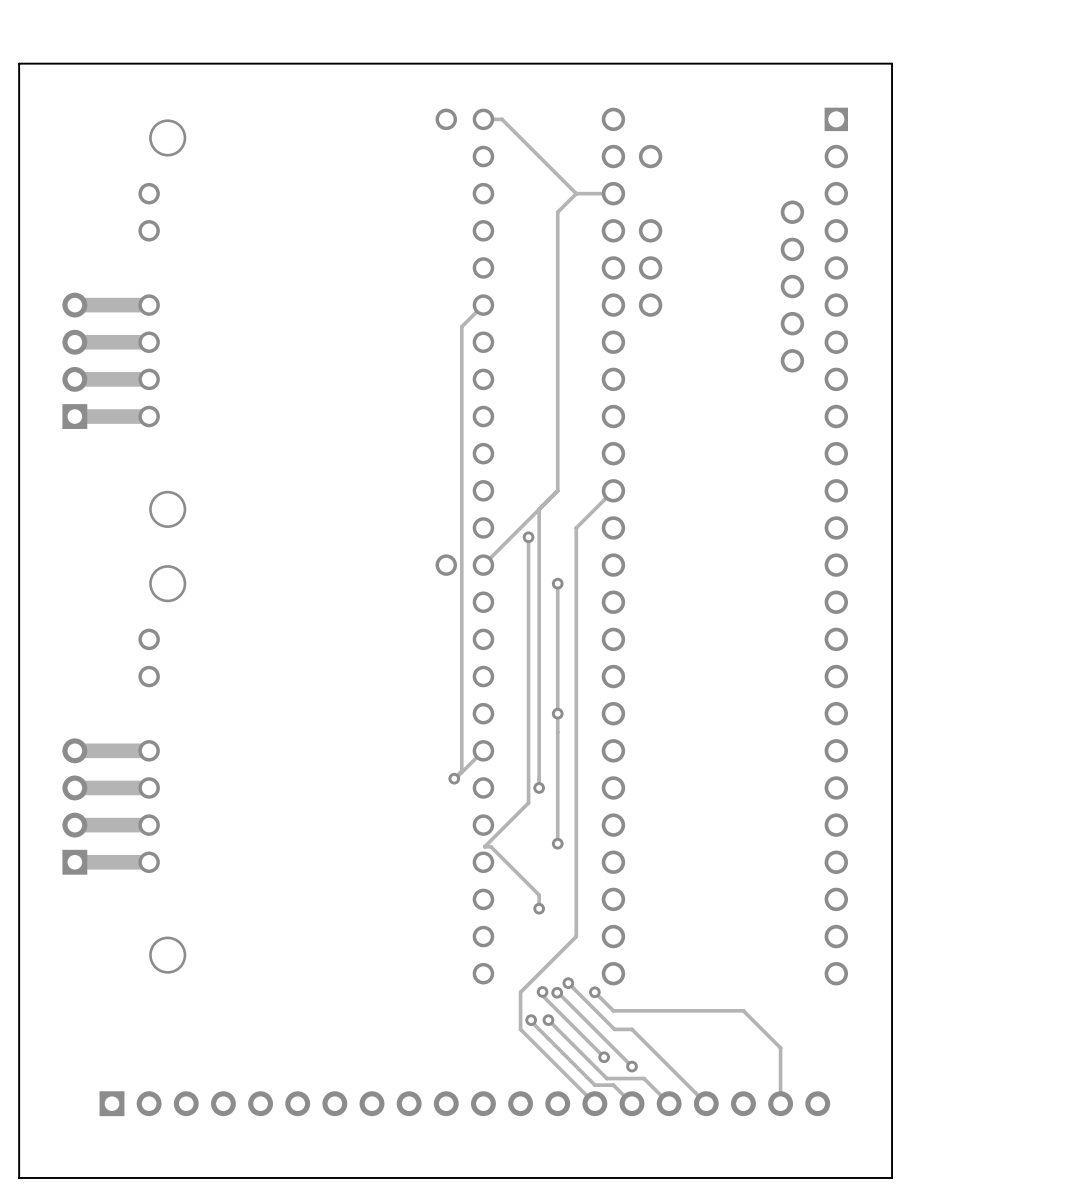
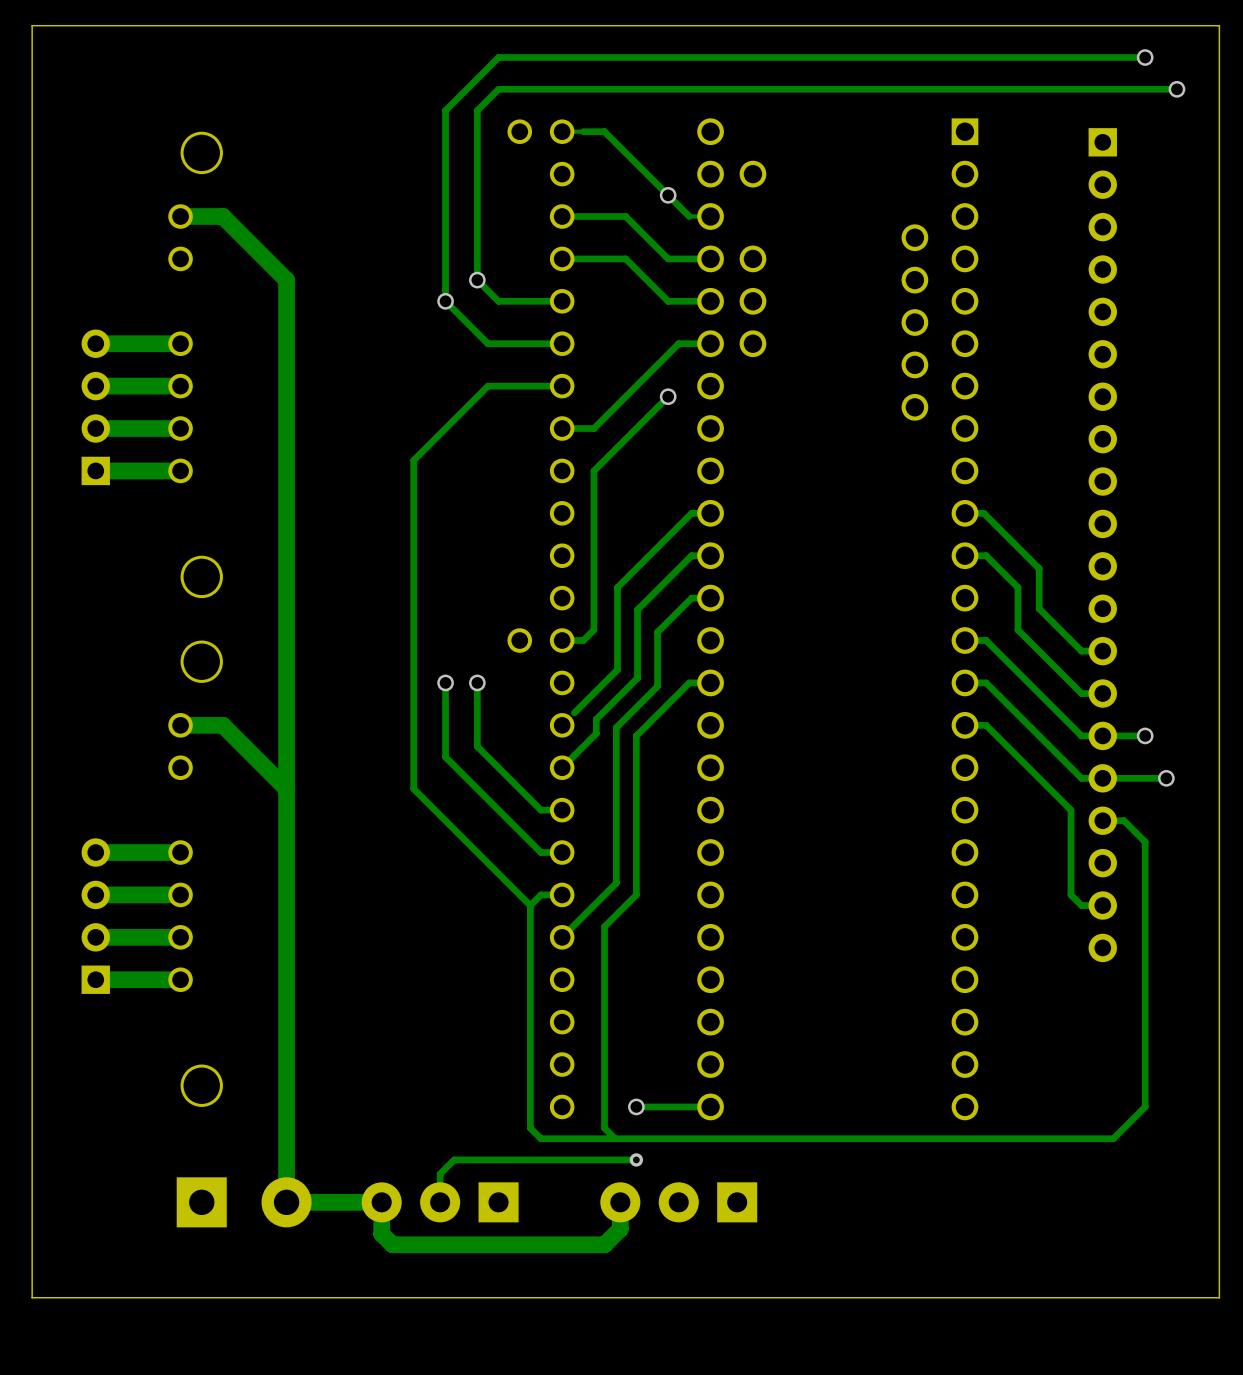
track: none -> (1145, 57) (498, 57) (445, 110) (445, 301) (487, 343) (562, 343)
via: none -> (1145, 57)
board edge: (19, 63) (892, 63) (892, 1177) (19, 1177) (19, 1140) -> (32, 68) (32, 25) (1219, 25) (1219, 1297) (32, 1297)
track: none -> (1176, 89) (498, 89) (477, 110) (477, 280) (498, 301) (562, 301)
via: none -> (1176, 89)
track: (502, 119) (576, 193) -> (583, 131) (604, 131) (689, 216)
via: none -> (668, 195)
track: none -> (180, 216) (222, 216) (286, 280) (286, 1202) (381, 1202) (381, 1233) (392, 1244) (604, 1244) (620, 1228) (620, 1202)
track: none -> (562, 216) (625, 216) (668, 258) (710, 258)
track: (576, 193) (557, 212) (557, 490) (483, 565) -> (668, 396) (593, 470) (593, 629) (583, 640) (562, 640)
track: (594, 193) (576, 193) -> none
track: none -> (562, 258) (625, 258) (668, 301) (710, 301)
via: none -> (477, 280)
via: none -> (445, 301)
track: (483, 305) (461, 326) (461, 771) (454, 778) (483, 750) -> (445, 682) (445, 757) (540, 852) (562, 852)
track: none -> (710, 343) (678, 343) (593, 428) (562, 428)
track: none -> (562, 386) (487, 386) (413, 460) (413, 788) (530, 905)
via: none -> (668, 396)
track: none -> (710, 513) (691, 513) (617, 587) (617, 669) (574, 712)
track: none -> (964, 513) (983, 513) (1039, 568) (1039, 608) (1081, 651) (1102, 651)
part: none -> (1102, 545)
track: (613, 490) (576, 527) (576, 936) (520, 992) (520, 1029) (594, 1103) -> (710, 555) (691, 555) (637, 609) (637, 678) (596, 719) (596, 733) (562, 767)
track: none -> (964, 555) (986, 555) (1017, 587) (1017, 629) (1081, 693) (1102, 693)
track: (539, 509) (539, 787) -> none
track: none -> (710, 598) (691, 598) (657, 632) (657, 686) (616, 727) (616, 883) (562, 937)
track: (528, 537) (528, 802) (484, 846) (490, 846) (539, 895) (539, 908) -> none
via: (528, 537) -> none
track: none -> (964, 640) (986, 640) (1081, 735) (1145, 735)
track: (557, 583) (557, 843) -> none
via: (557, 583) -> none
via: none -> (445, 682)
track: none -> (477, 682) (477, 746) (540, 810) (562, 810)
via: none -> (477, 682)
track: none -> (710, 682) (689, 682) (636, 735) (636, 894) (604, 926) (604, 1128) (615, 1138)
track: none -> (964, 682) (986, 682) (1081, 778) (1166, 778)
track: none -> (180, 725) (222, 725) (286, 788)
track: none -> (964, 725) (986, 725) (1070, 810) (1070, 894) (1081, 905) (1102, 905)
via: none -> (1145, 735)
via: none -> (1166, 778)
via: (557, 713) -> none
track: none -> (1102, 820) (1123, 820) (1145, 841) (1145, 1106) (1113, 1138) (540, 1138) (530, 1128) (530, 905)
via: (454, 778) -> none
track: none -> (562, 894) (540, 894) (530, 905)
via: (539, 787) -> none
via: (557, 843) -> none
via: (539, 908) -> none
via: none -> (636, 1106)
track: none -> (710, 1106) (633, 1106)
track: (568, 983) (614, 1029) (632, 1029) (706, 1103) -> none
via: (568, 983) -> none
track: (542, 991) (542, 995) (604, 1057) -> none
via: (542, 991) -> none
track: (557, 992) (632, 1066) -> none
via: (557, 992) -> none
track: (594, 992) (613, 1010) (743, 1010) (780, 1047) (780, 1103) -> none
via: (594, 992) -> none
track: (531, 1020) (594, 1085) (613, 1085) (632, 1103) -> none
via: (531, 1020) -> none
track: (548, 1020) (606, 1078) (644, 1078) (669, 1103) -> (636, 1159) (454, 1159) (440, 1174) (440, 1202)
part: none -> (244, 1202)
part: none -> (440, 1202)
part: none -> (678, 1202)
via: (604, 1057) -> none
via: (632, 1066) -> none
part: (464, 1103) -> none

